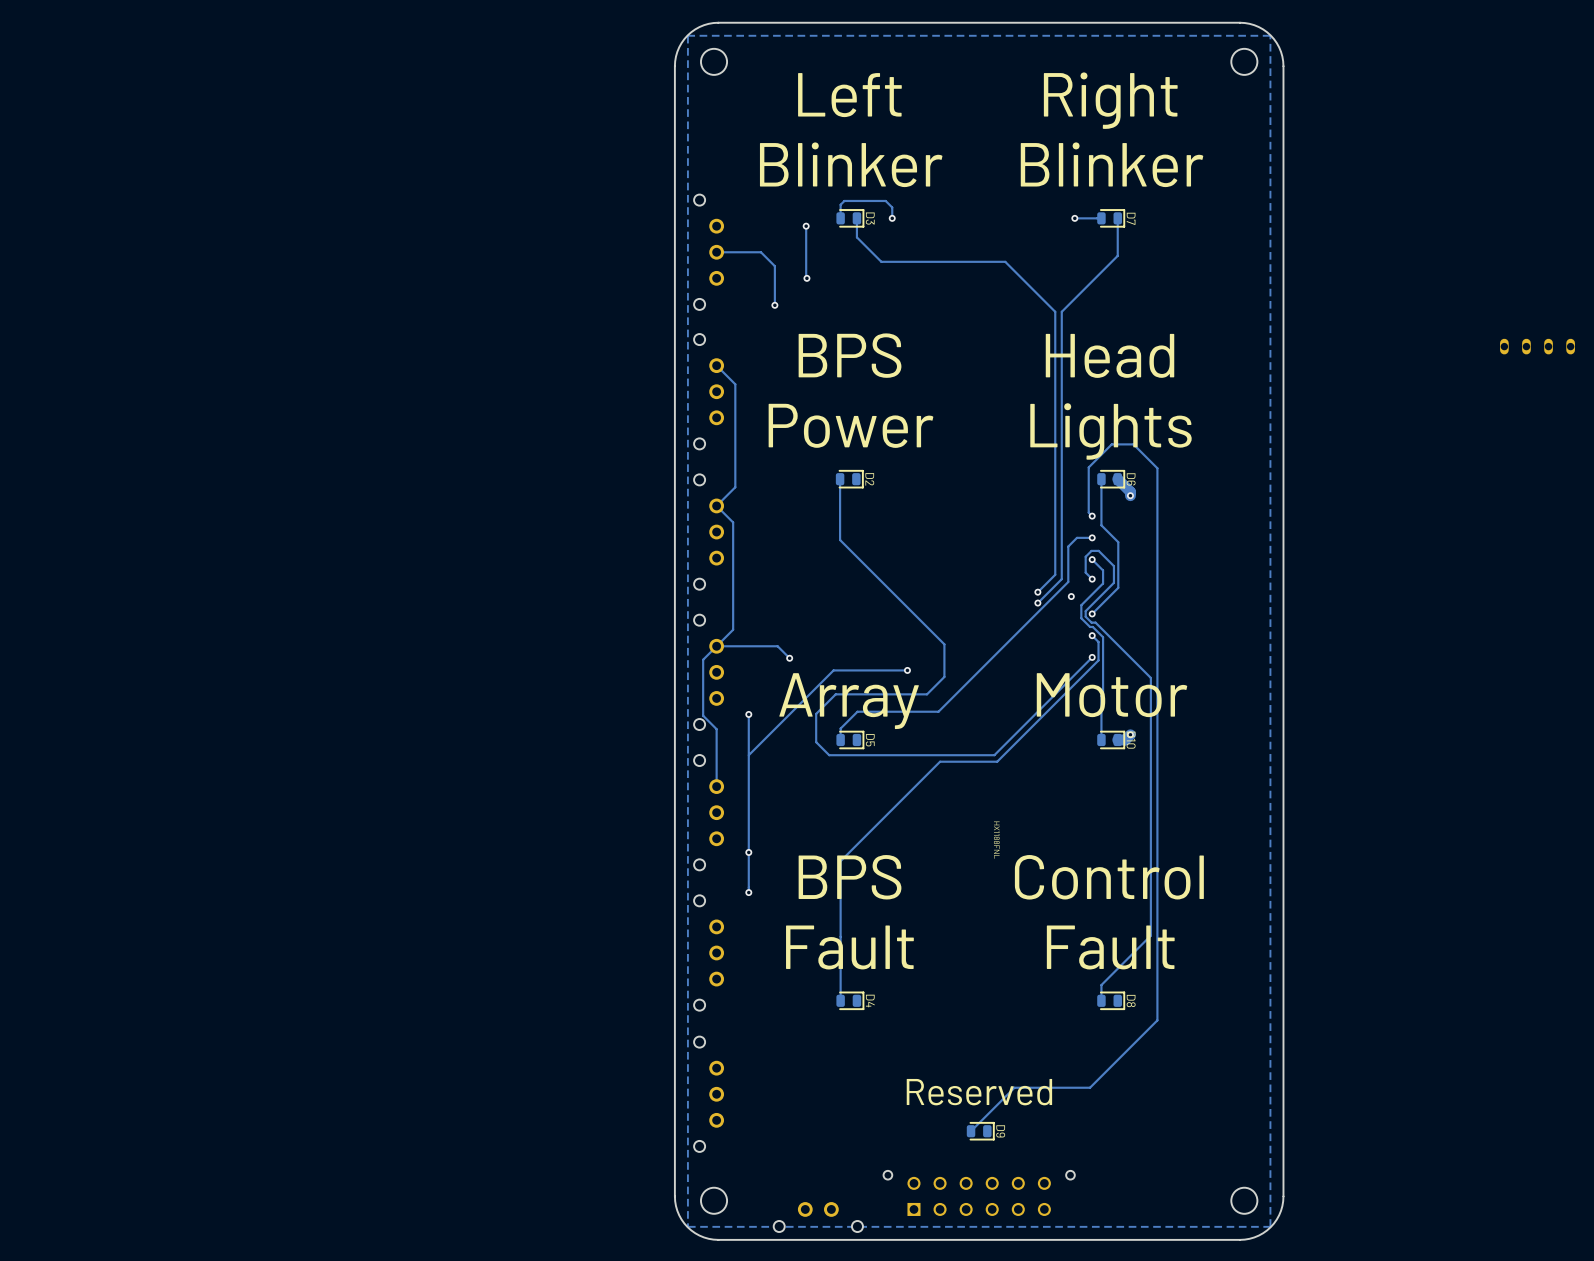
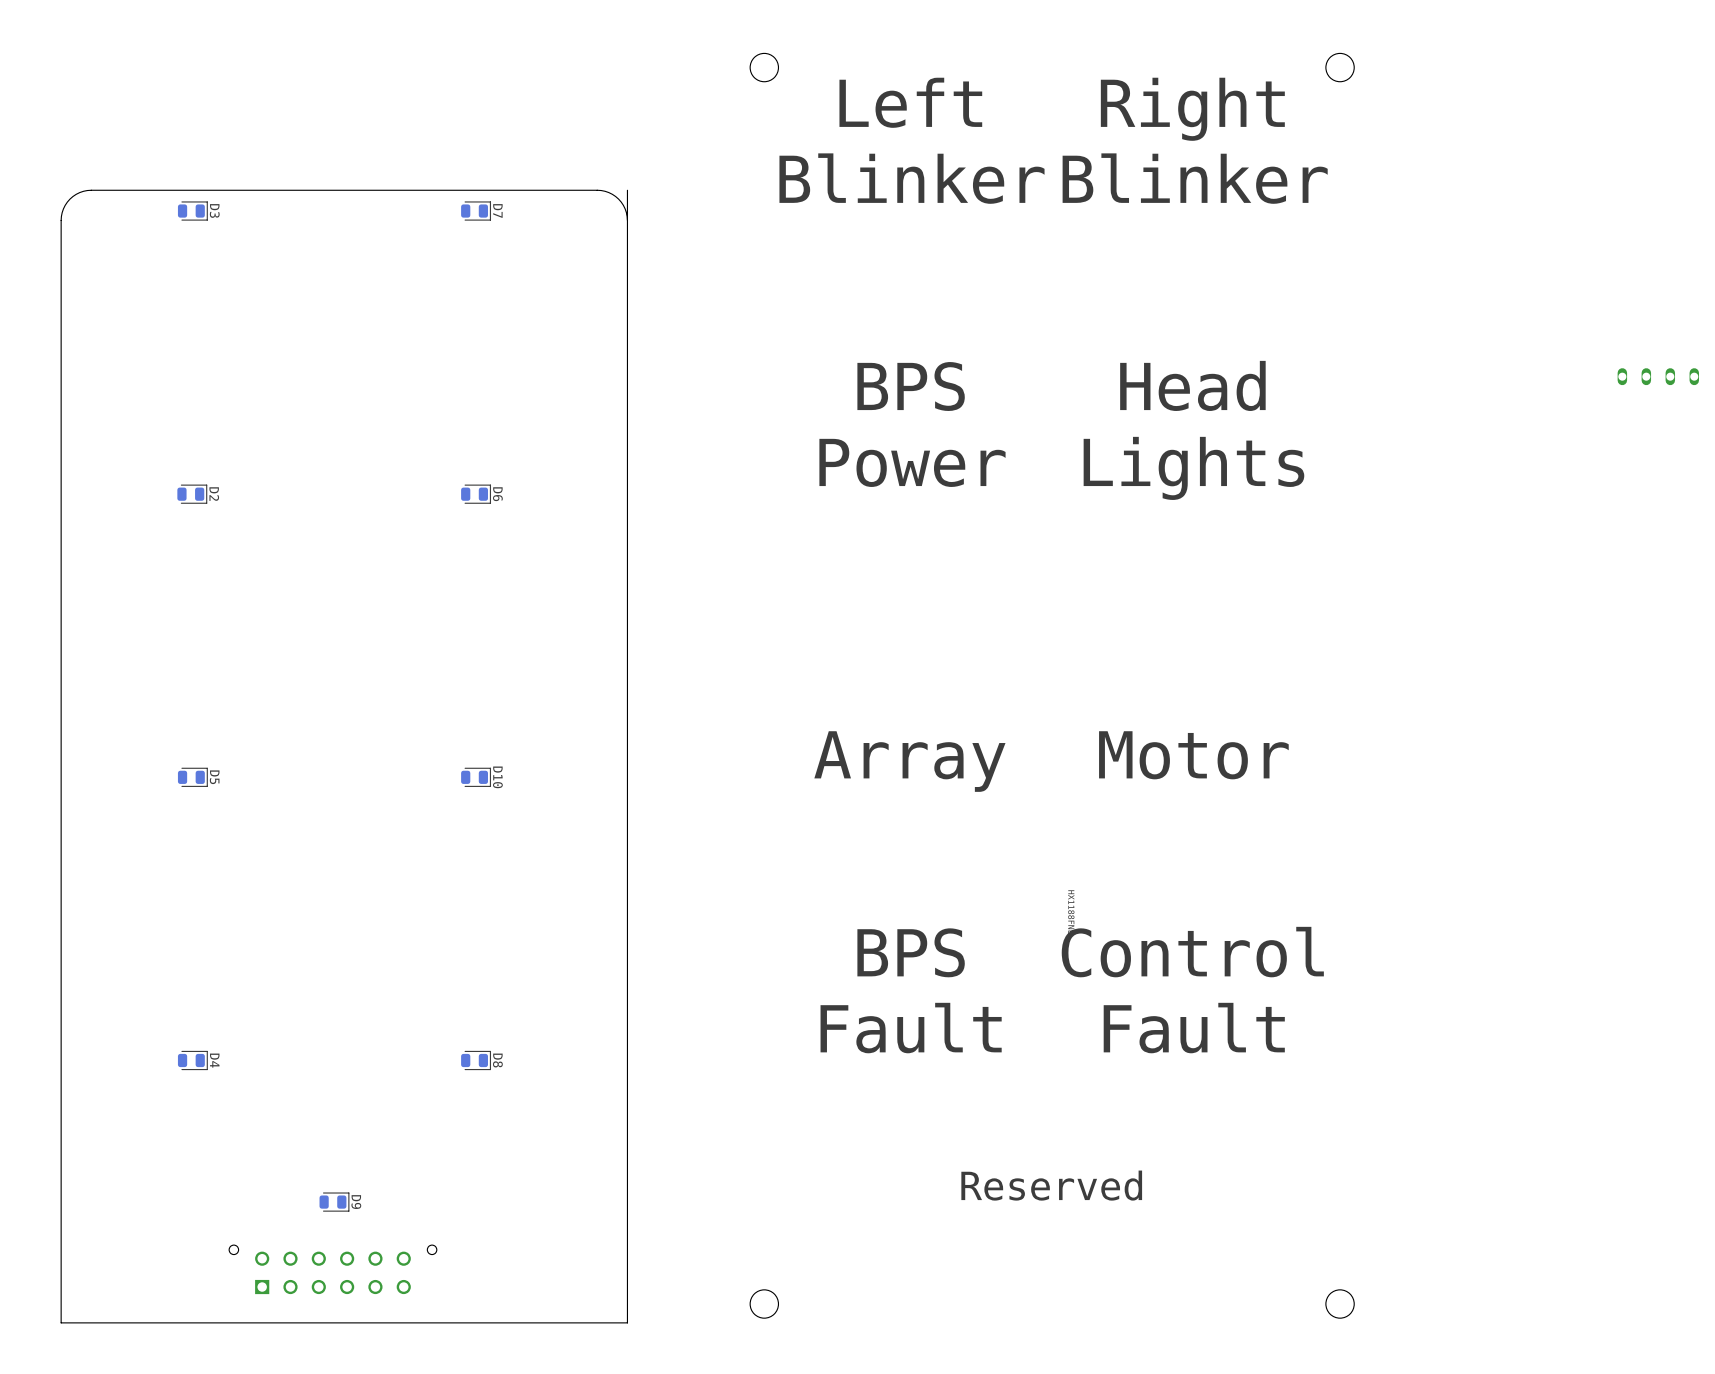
board edge: (1240, 22) (718, 22) (704, 25) (695, 29) (687, 35) (679, 47) (674, 66) (674, 1196) (677, 1210) (681, 1219) (687, 1227) (699, 1235) (718, 1239) (1240, 1239) (1254, 1237) (1263, 1233) (1270, 1227) (1279, 1215) (1283, 1196) (1283, 66) (1281, 51) (1270, 35) (1258, 27) (1240, 22) -> none
zone outline: (1270, 35) (1270, 1226) (687, 1226) (687, 35) (1270, 35) -> none
board edge: none -> (627, 190) (627, 1322) (61, 1322) (61, 220) (65, 205) (76, 194) (91, 190) (597, 190) (608, 192) (618, 199) (625, 208) (626, 212) (627, 216) (627, 220)
D3 position: (850, 218) -> (192, 211)
track: (856, 218) (856, 237) (881, 261) (1005, 261) (1055, 311) (1055, 574) (1037, 592) -> none
track: (892, 218) (892, 207) (885, 200) (844, 200) (840, 204) (840, 218) -> none
via: (892, 218) -> none
via: (1074, 218) -> none
track: (1101, 218) (1074, 218) -> none
D7 position: (1110, 218) -> (476, 211)
track: (1117, 218) (1117, 255) (1061, 311) (1061, 579) (1037, 603) -> none
track: (806, 226) (806, 278) -> none
via: (806, 226) -> none
part: (709, 252) -> none
track: (716, 252) (760, 252) (774, 266) (774, 305) -> none
via: (806, 278) -> none
via: (774, 305) -> none
track: (716, 365) (735, 384) (735, 487) (716, 505) (733, 522) (733, 629) (703, 659) (703, 715) (716, 729) (716, 786) -> none
part: (709, 391) -> none
track: (840, 479) (840, 540) (944, 644) (944, 676) (927, 694) (835, 694) (816, 713) (816, 742) (829, 755) (994, 755) (1092, 657) -> none
D2 position: (849, 479) -> (192, 494)
track: (1101, 479) (1101, 525) (1118, 542) (1118, 587) (1092, 613) -> none
D6 position: (1110, 479) -> (476, 494)
track: (1117, 479) (1130, 491) (1130, 495) -> none
via: (1130, 495) -> none
track: (1092, 516) (1088, 512) (1088, 467) (1111, 444) (1133, 444) (1157, 468) (1157, 1020) (1090, 1087) (1014, 1087) (971, 1131) -> none
via: (1092, 516) -> none
part: (709, 532) -> none
track: (1092, 537) (1076, 537) (1068, 546) (1068, 581) (938, 711) (857, 711) (840, 728) (840, 739) -> none
via: (1092, 537) -> none
track: (1092, 559) (1103, 570) (1103, 583) (1081, 605) (1081, 618) (1103, 637) (1101, 739) -> none
via: (1092, 559) -> none
track: (1092, 579) (1085, 572) (1085, 556) (1091, 550) (1098, 550) (1113, 566) (1113, 582) (1085, 611) (1085, 616) (1091, 622) (1095, 622) (1150, 677) (1150, 935) (1101, 985) (1101, 1000) -> none
via: (1092, 579) -> none
via: (1037, 592) -> none
via: (1071, 596) -> none
via: (1037, 603) -> none
via: (1092, 613) -> none
track: (1092, 635) (1098, 641) (1098, 660) (997, 761) (940, 761) (840, 861) (840, 1000) -> none
via: (1092, 635) -> none
track: (716, 646) (777, 646) (789, 658) -> none
via: (1092, 657) -> none
via: (789, 658) -> none
track: (907, 670) (833, 670) (748, 755) -> none
via: (907, 670) -> none
part: (709, 672) -> none
track: (748, 714) (748, 892) -> none
via: (748, 714) -> none
track: (1130, 734) (1125, 739) (1117, 739) -> none
via: (1130, 734) -> none
D5 position: (850, 739) -> (192, 777)
D10 position: (1110, 739) -> (476, 777)
part: (709, 812) -> none
via: (748, 852) -> none
via: (748, 892) -> none
part: (709, 952) -> none
D4 position: (850, 1000) -> (192, 1060)
D8 position: (1110, 1000) -> (476, 1060)
part: (709, 1094) -> none
D9 position: (980, 1131) -> (334, 1202)
part: none -> (332, 1269)
part: (979, 1193) -> none
part: (818, 1217) -> none

